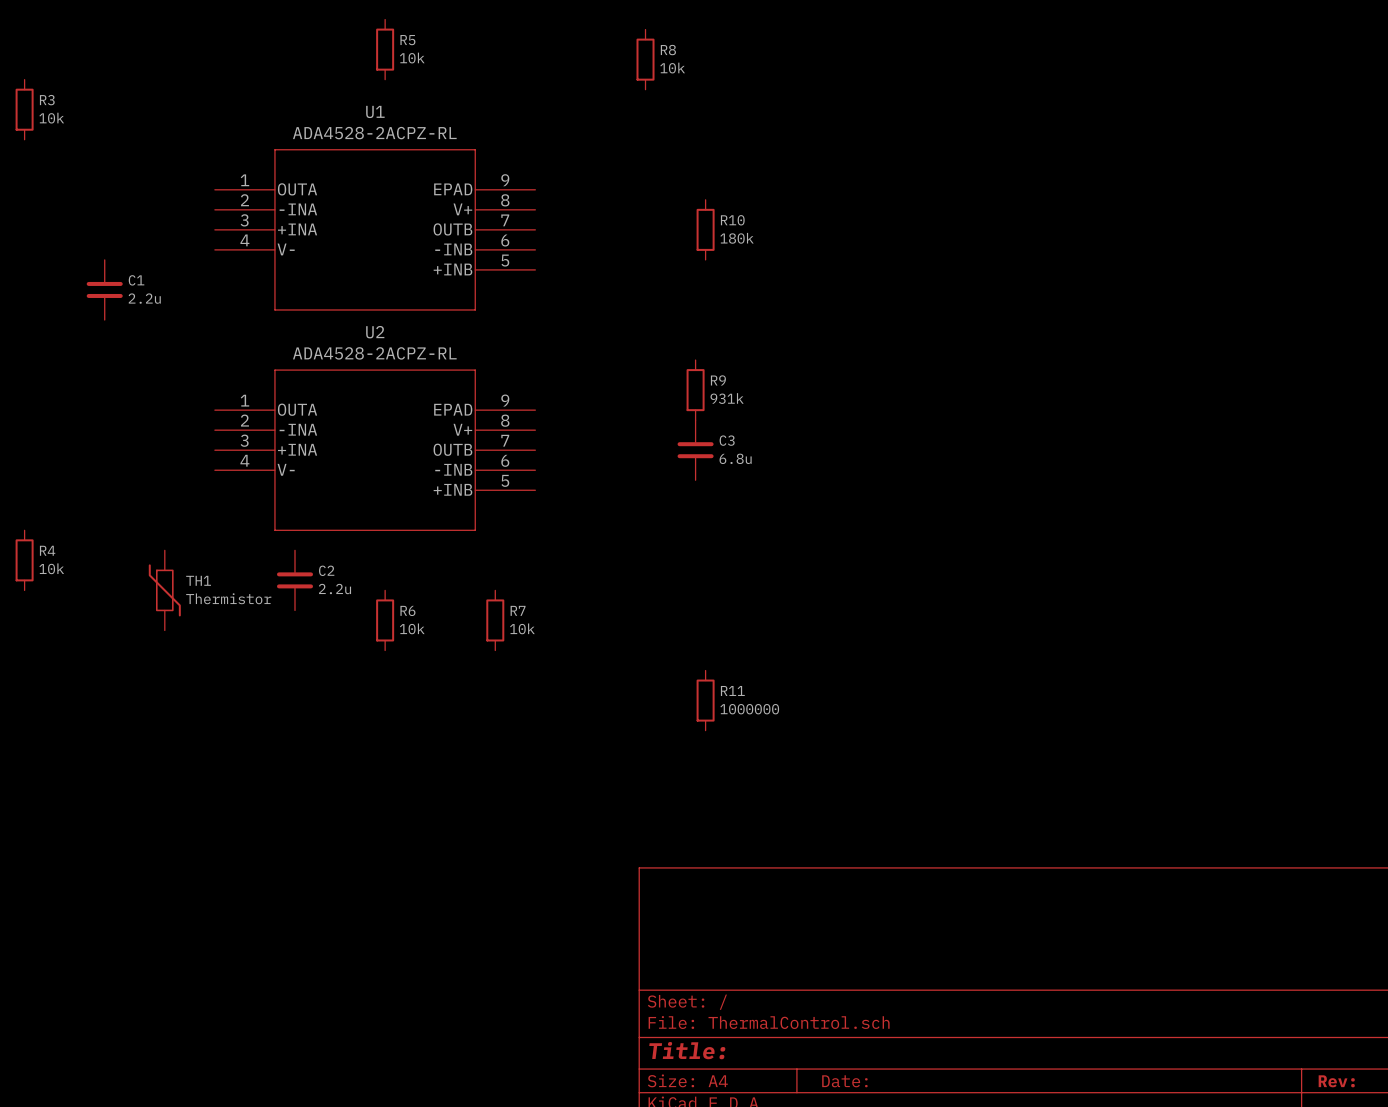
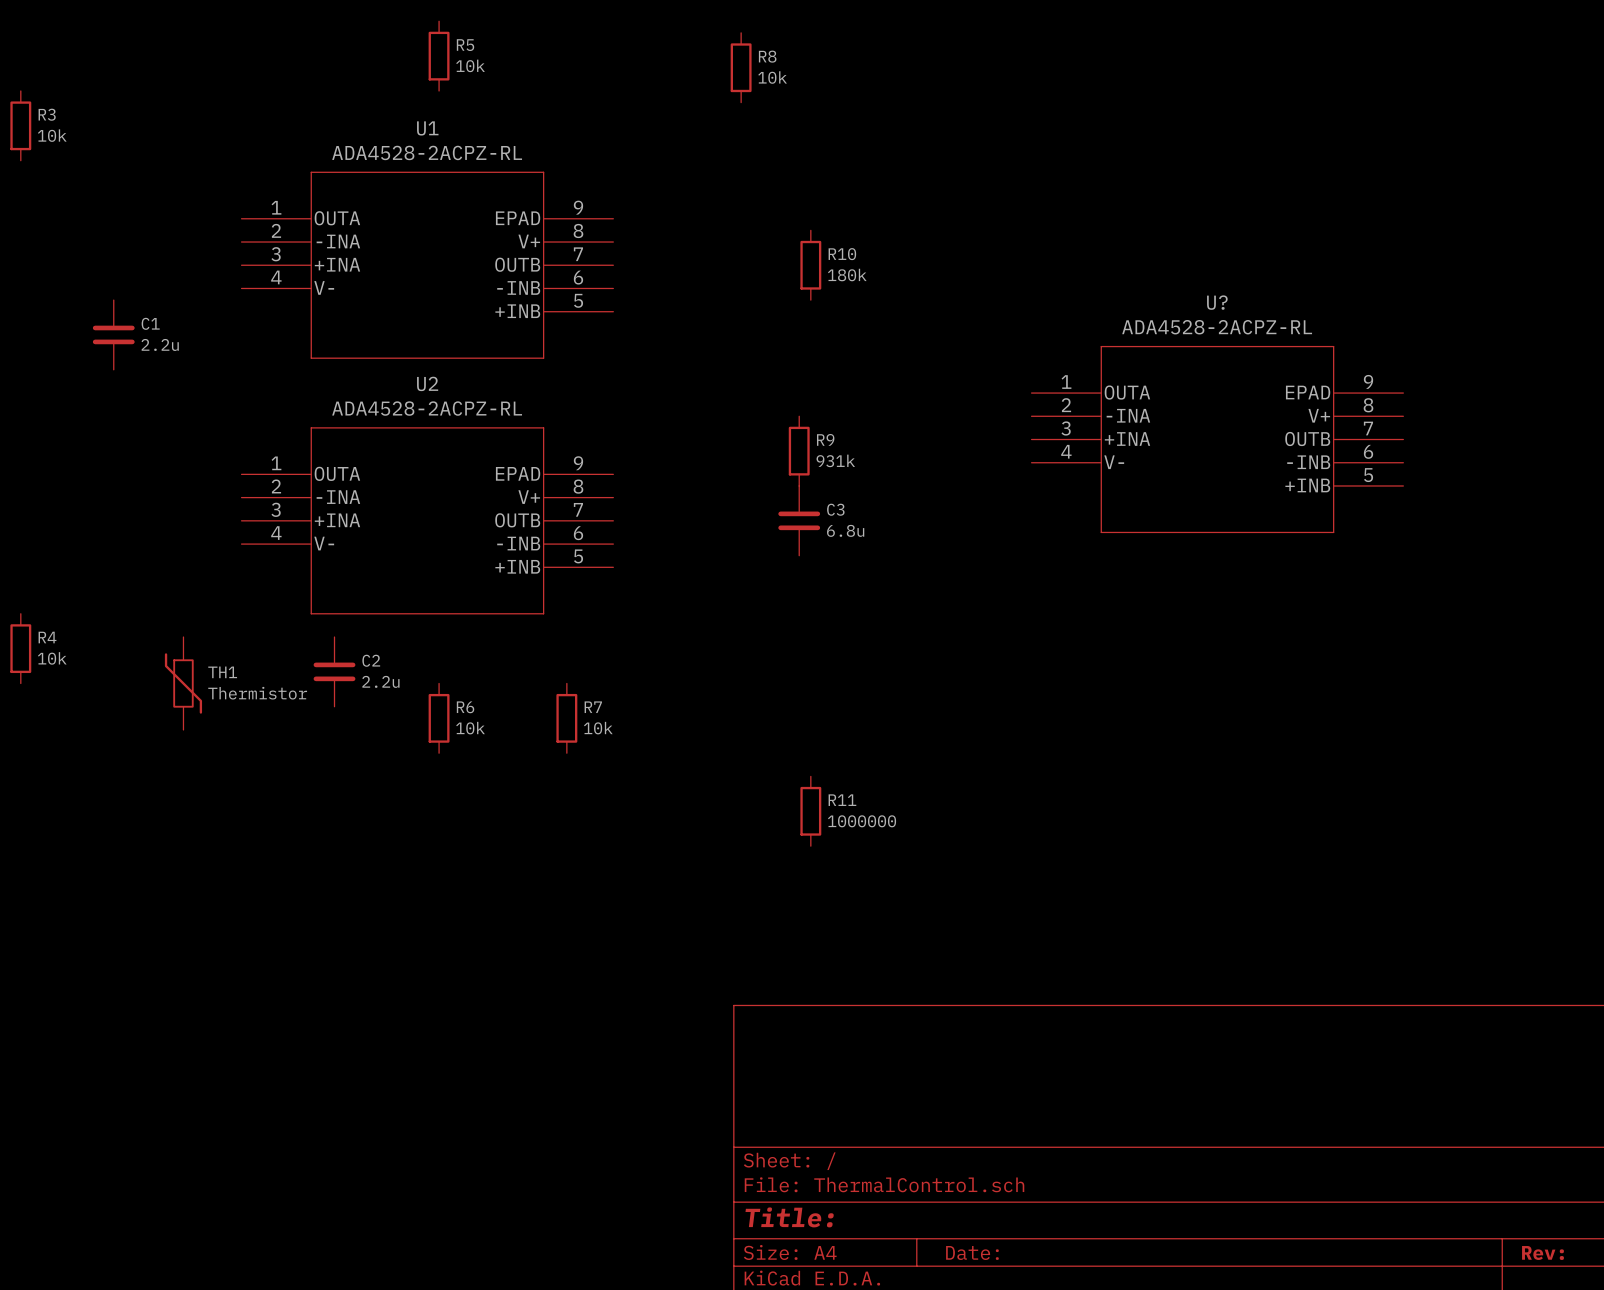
U?: none -> ADA4528-2ACPZ-RL (1217, 439)

